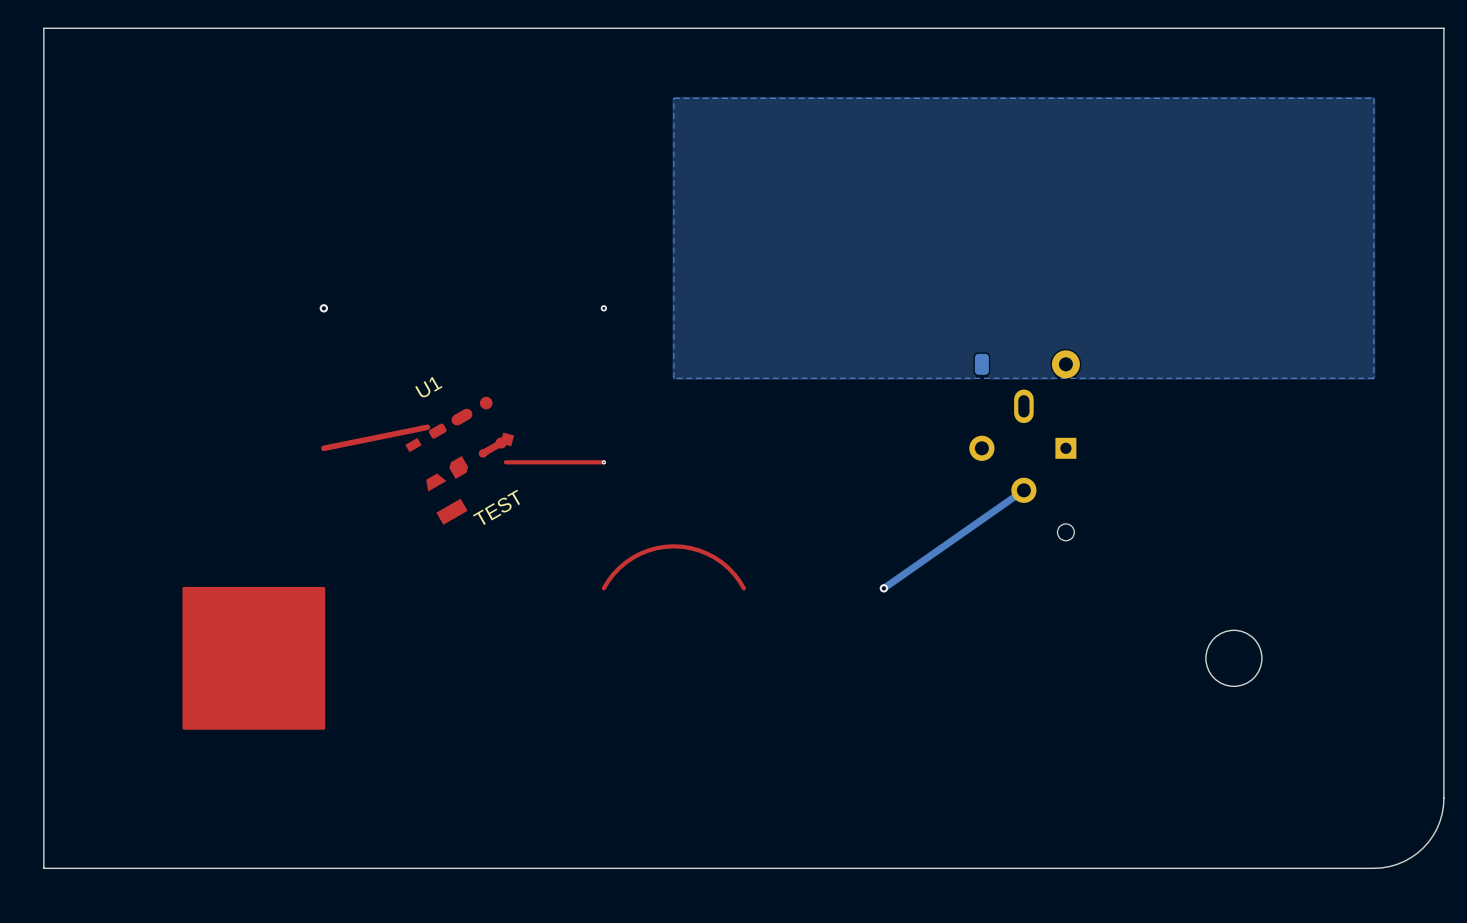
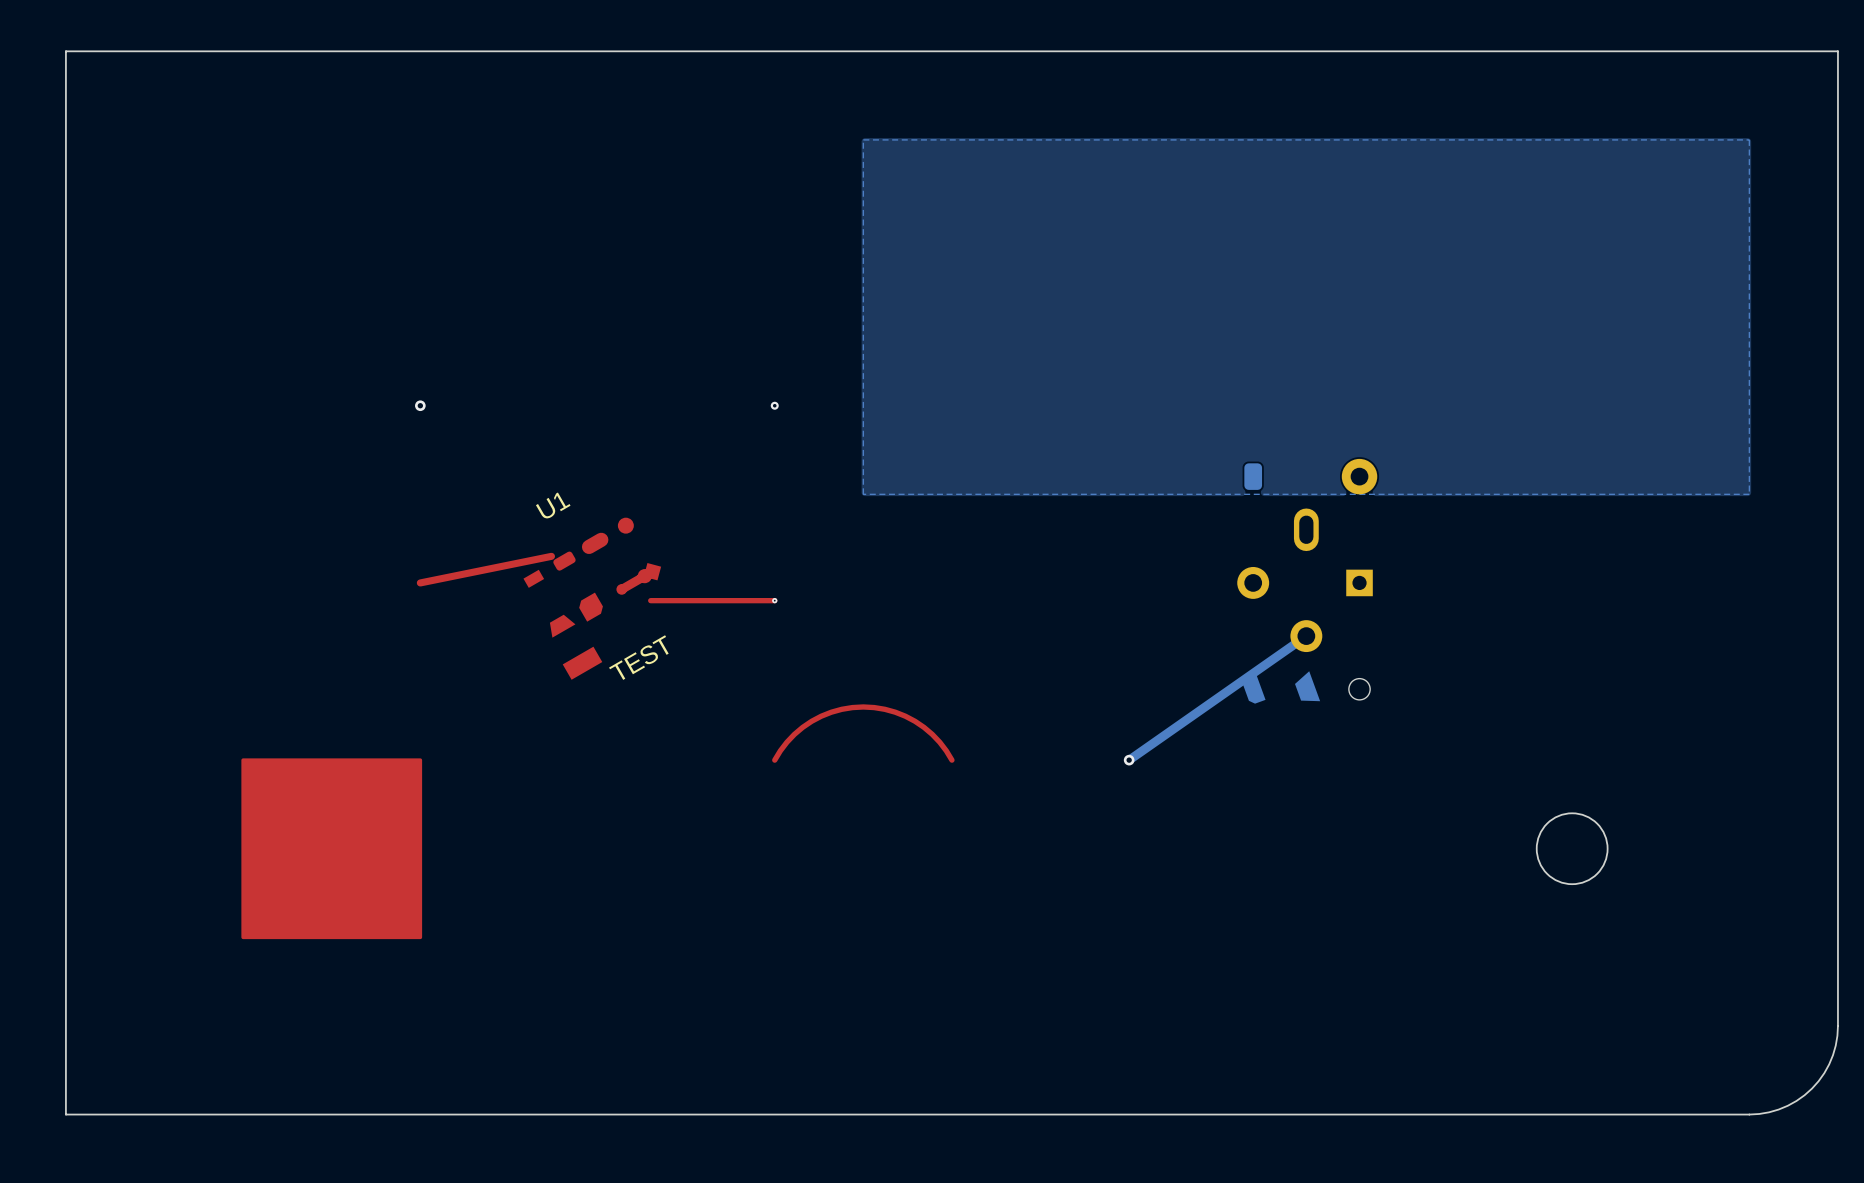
part footprint: [969, 350, 1080, 541] -> [1237, 458, 1378, 704]

